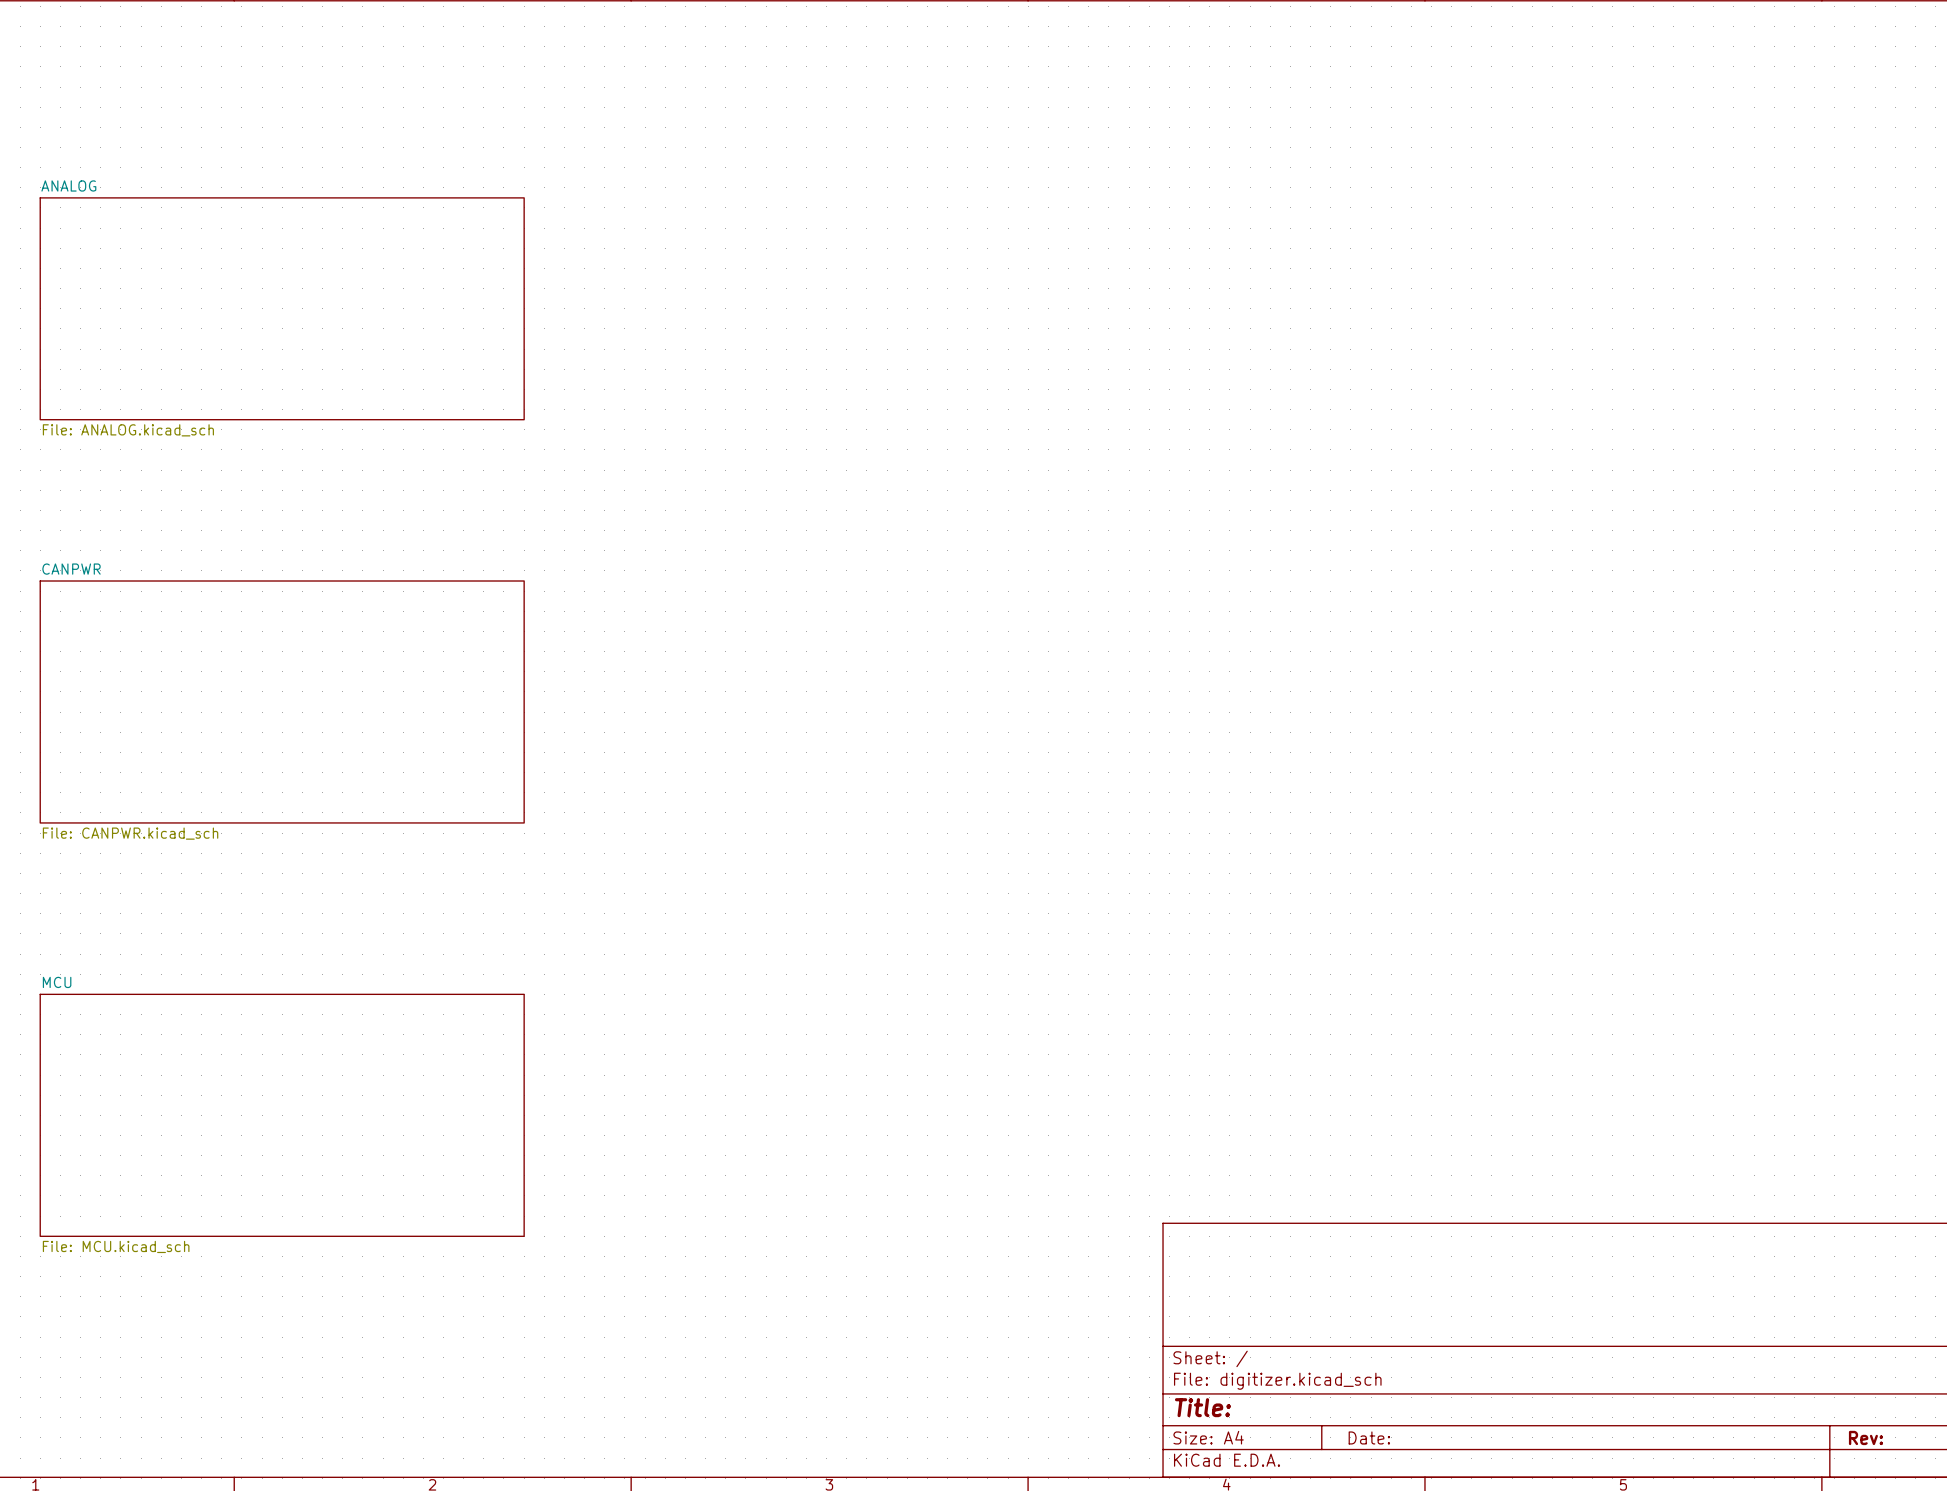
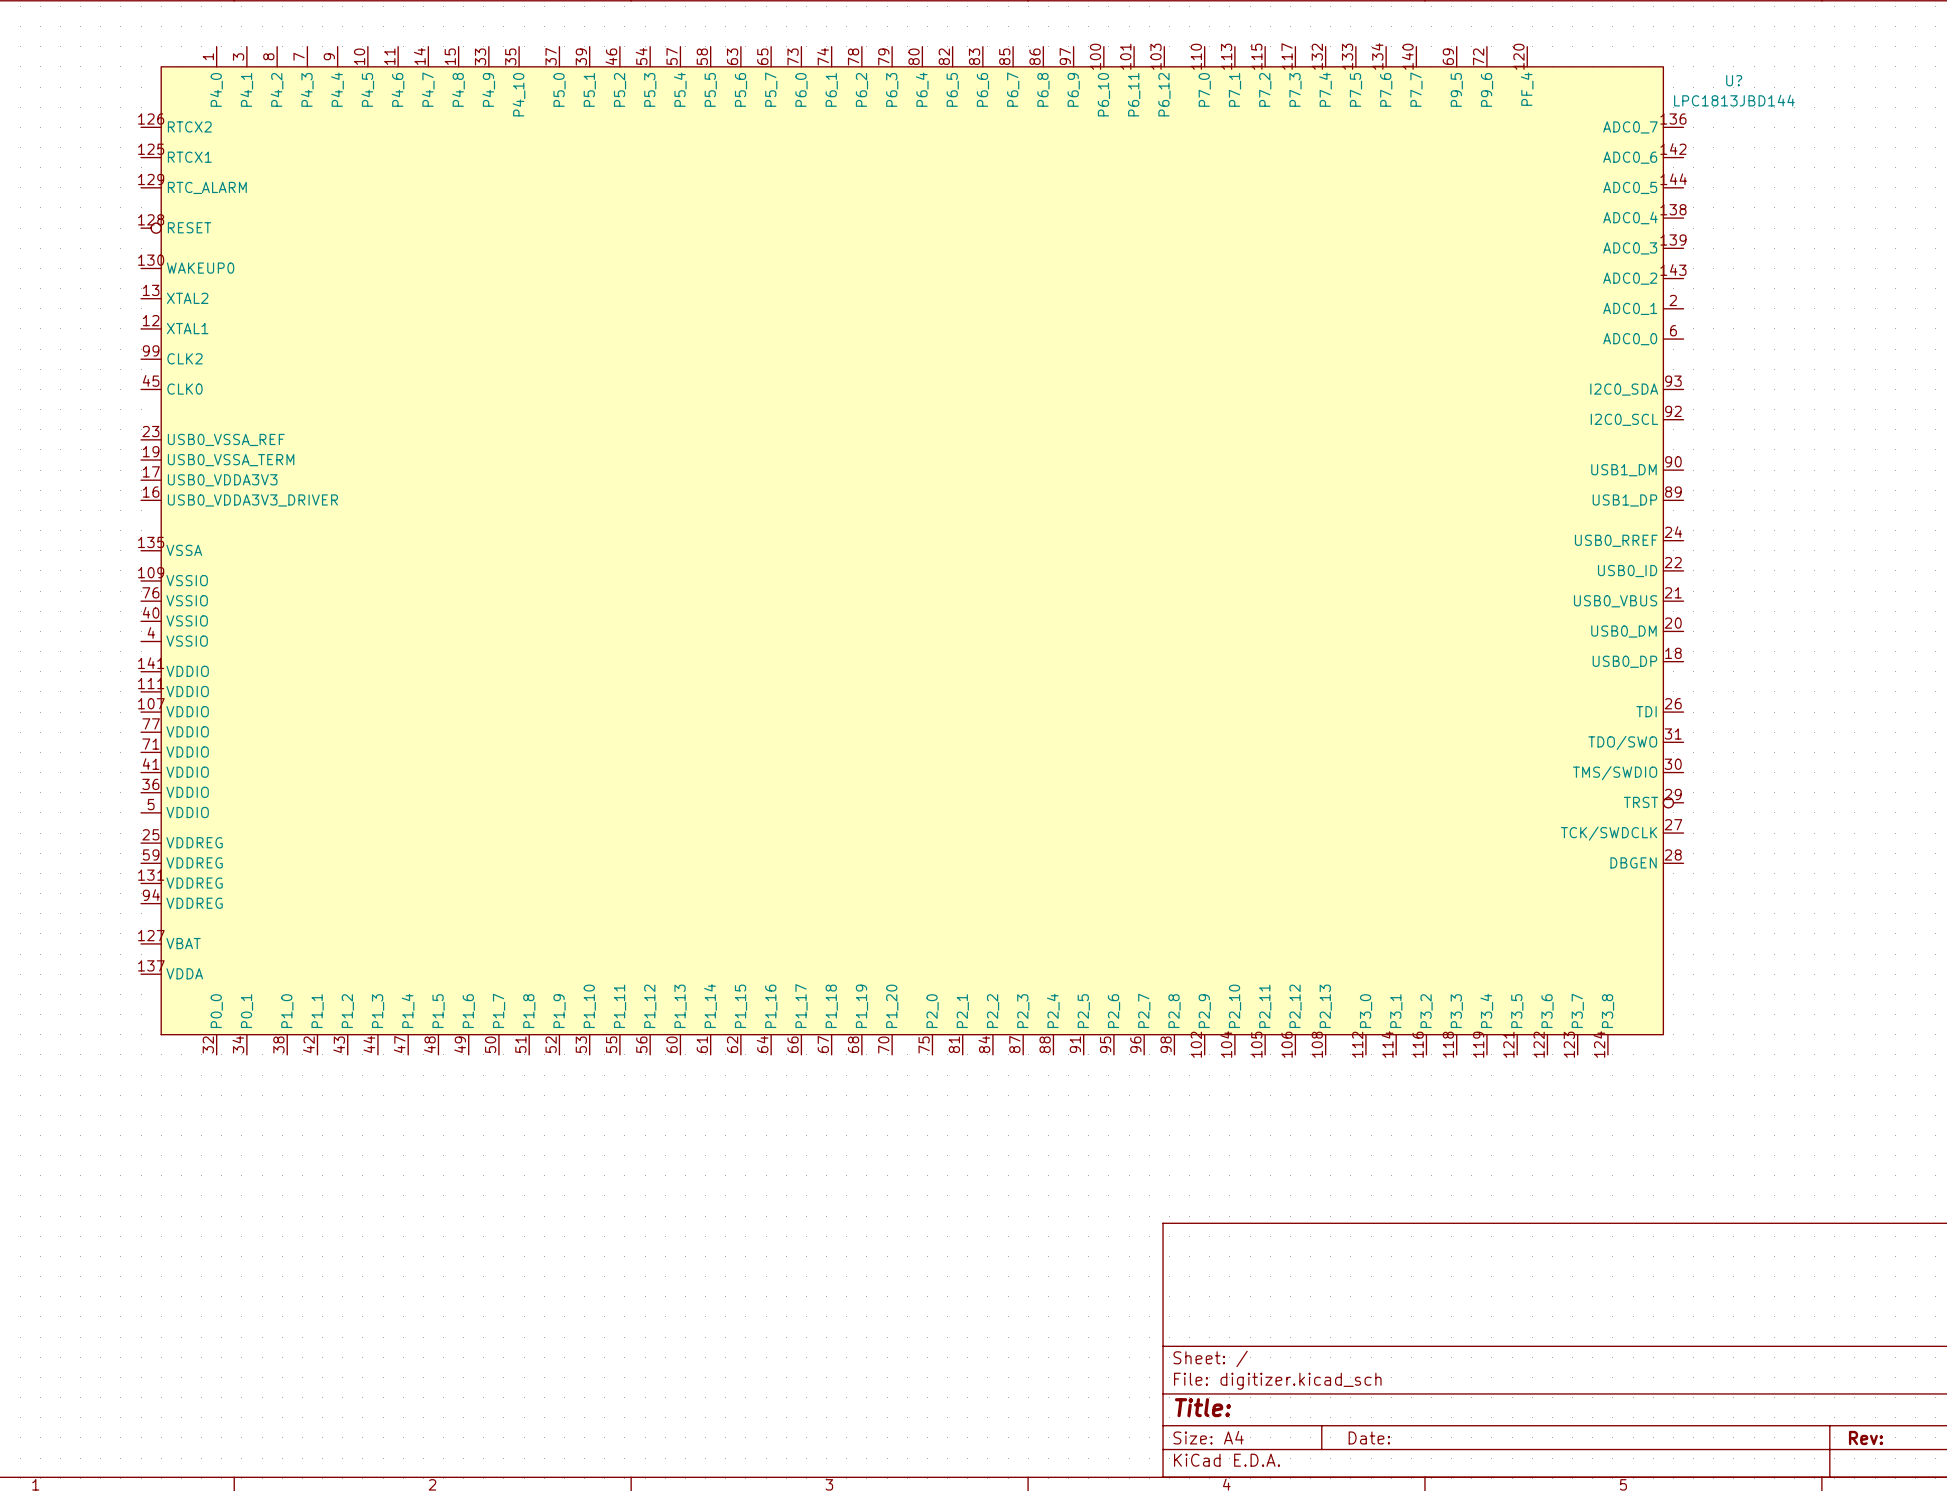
sheet ANALOG: File: ANALOG.kicad_sch (282, 308) -> none
U?: none -> LPC1813JBD144 (912, 550)
sheet CANPWR: File: CANPWR.kicad_sch (282, 701) -> none
sheet MCU: File: MCU.kicad_sch (282, 1115) -> none

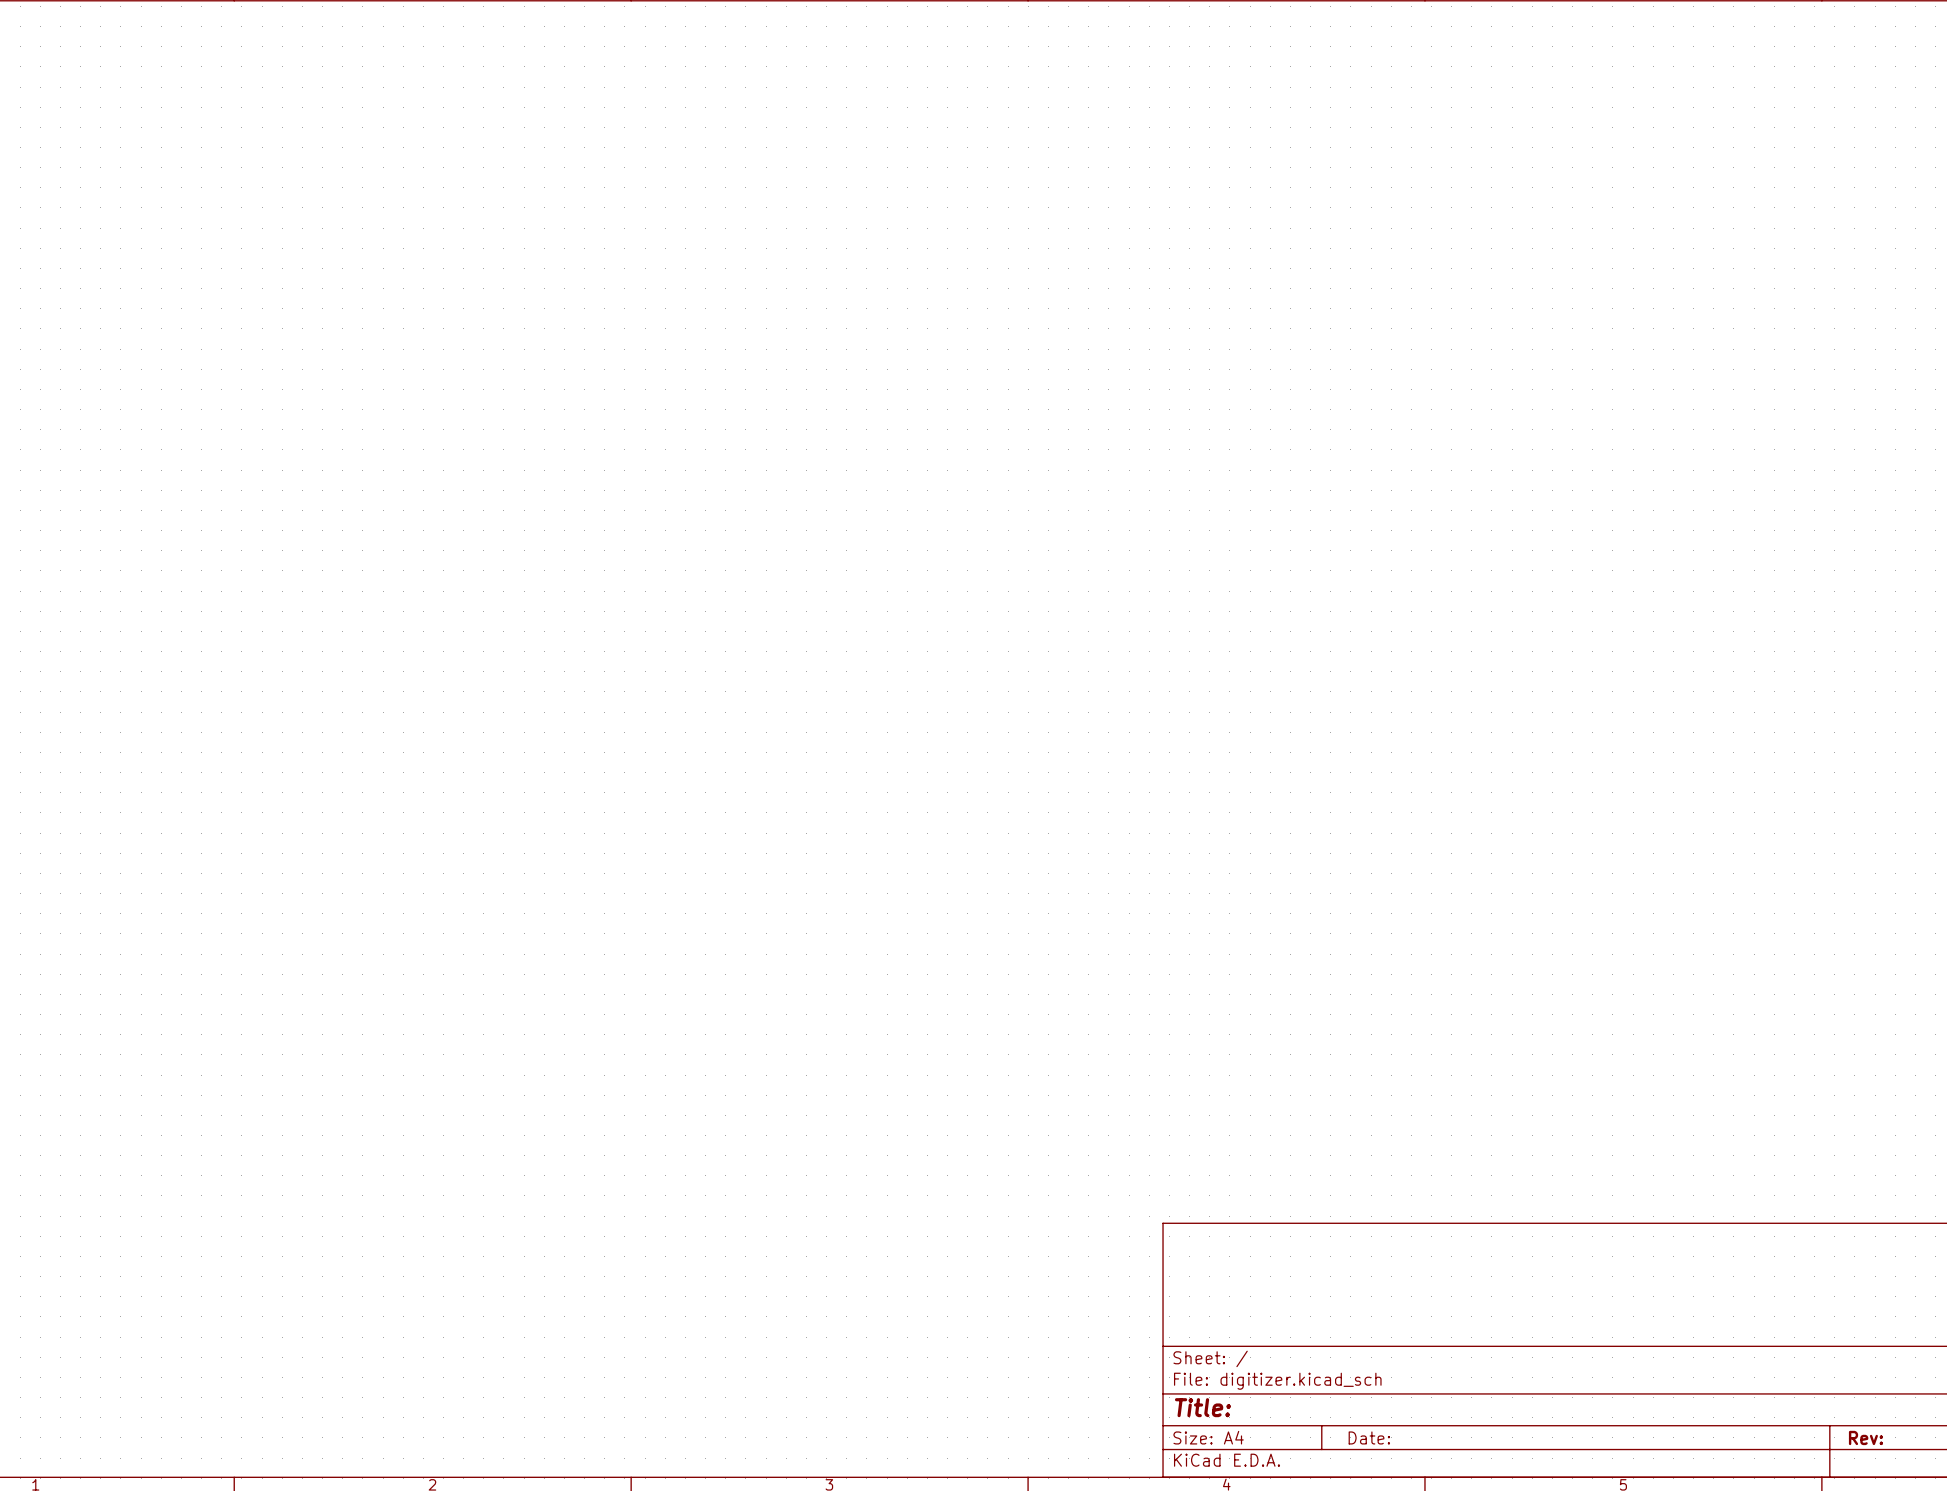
U?: LPC1813JBD144 (912, 550) -> none

